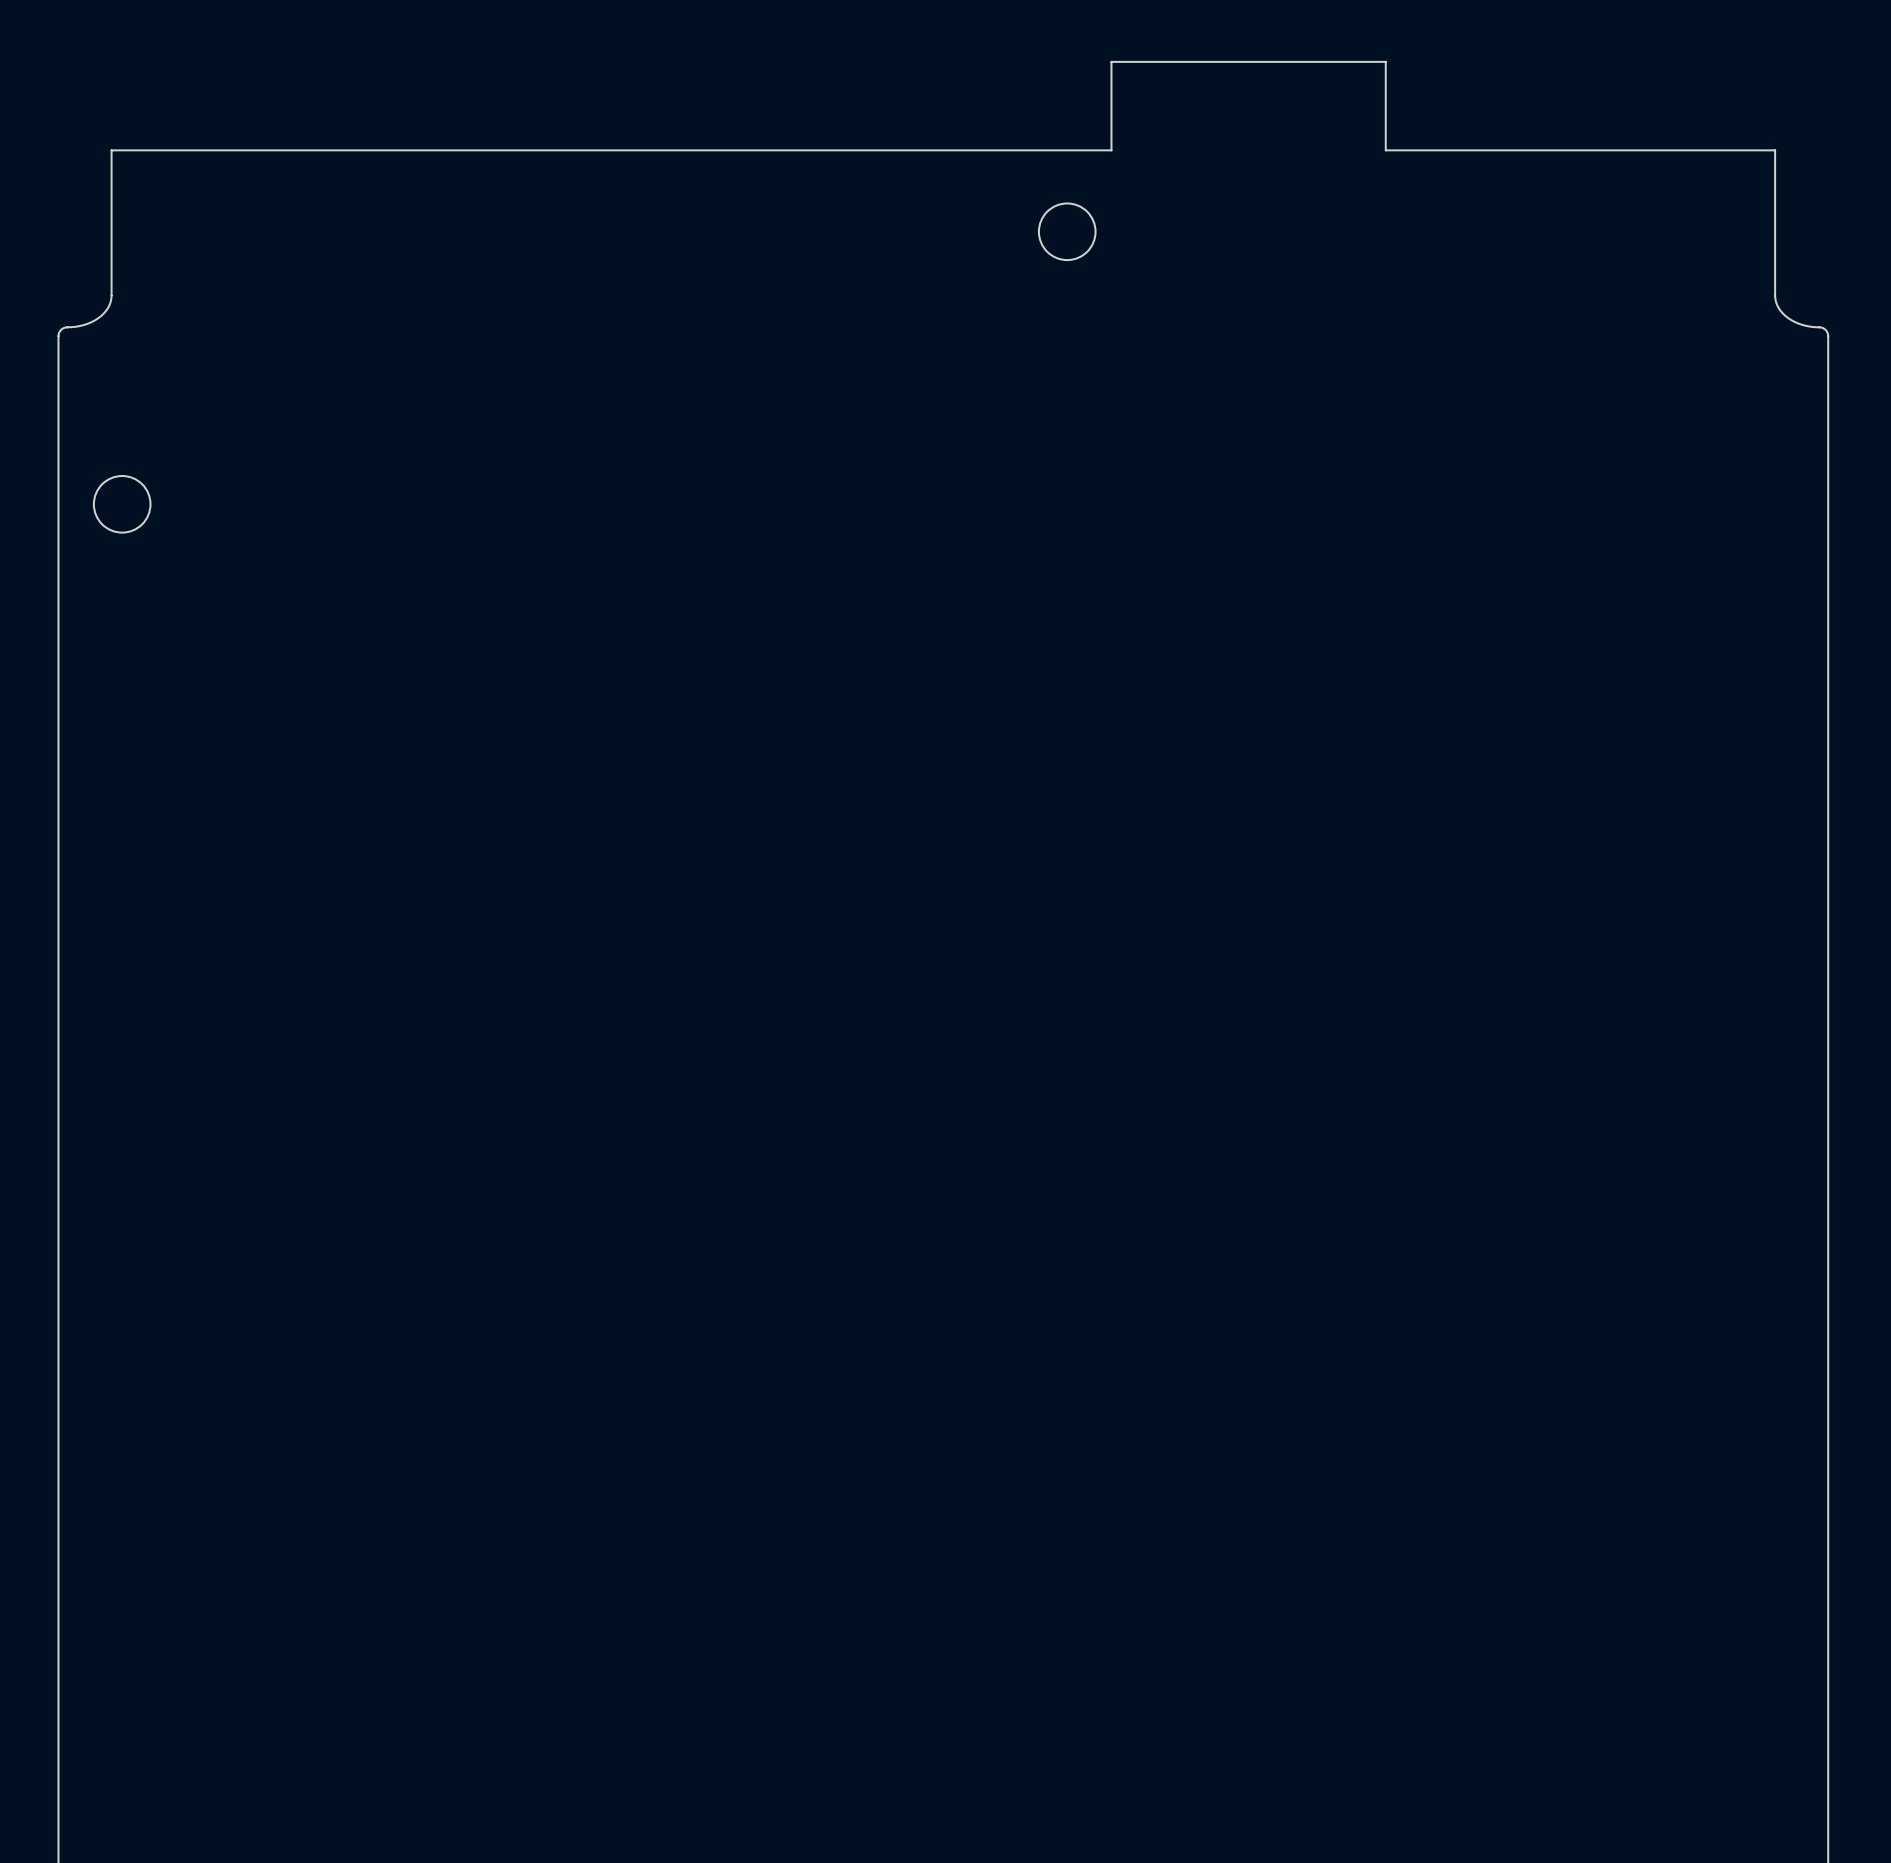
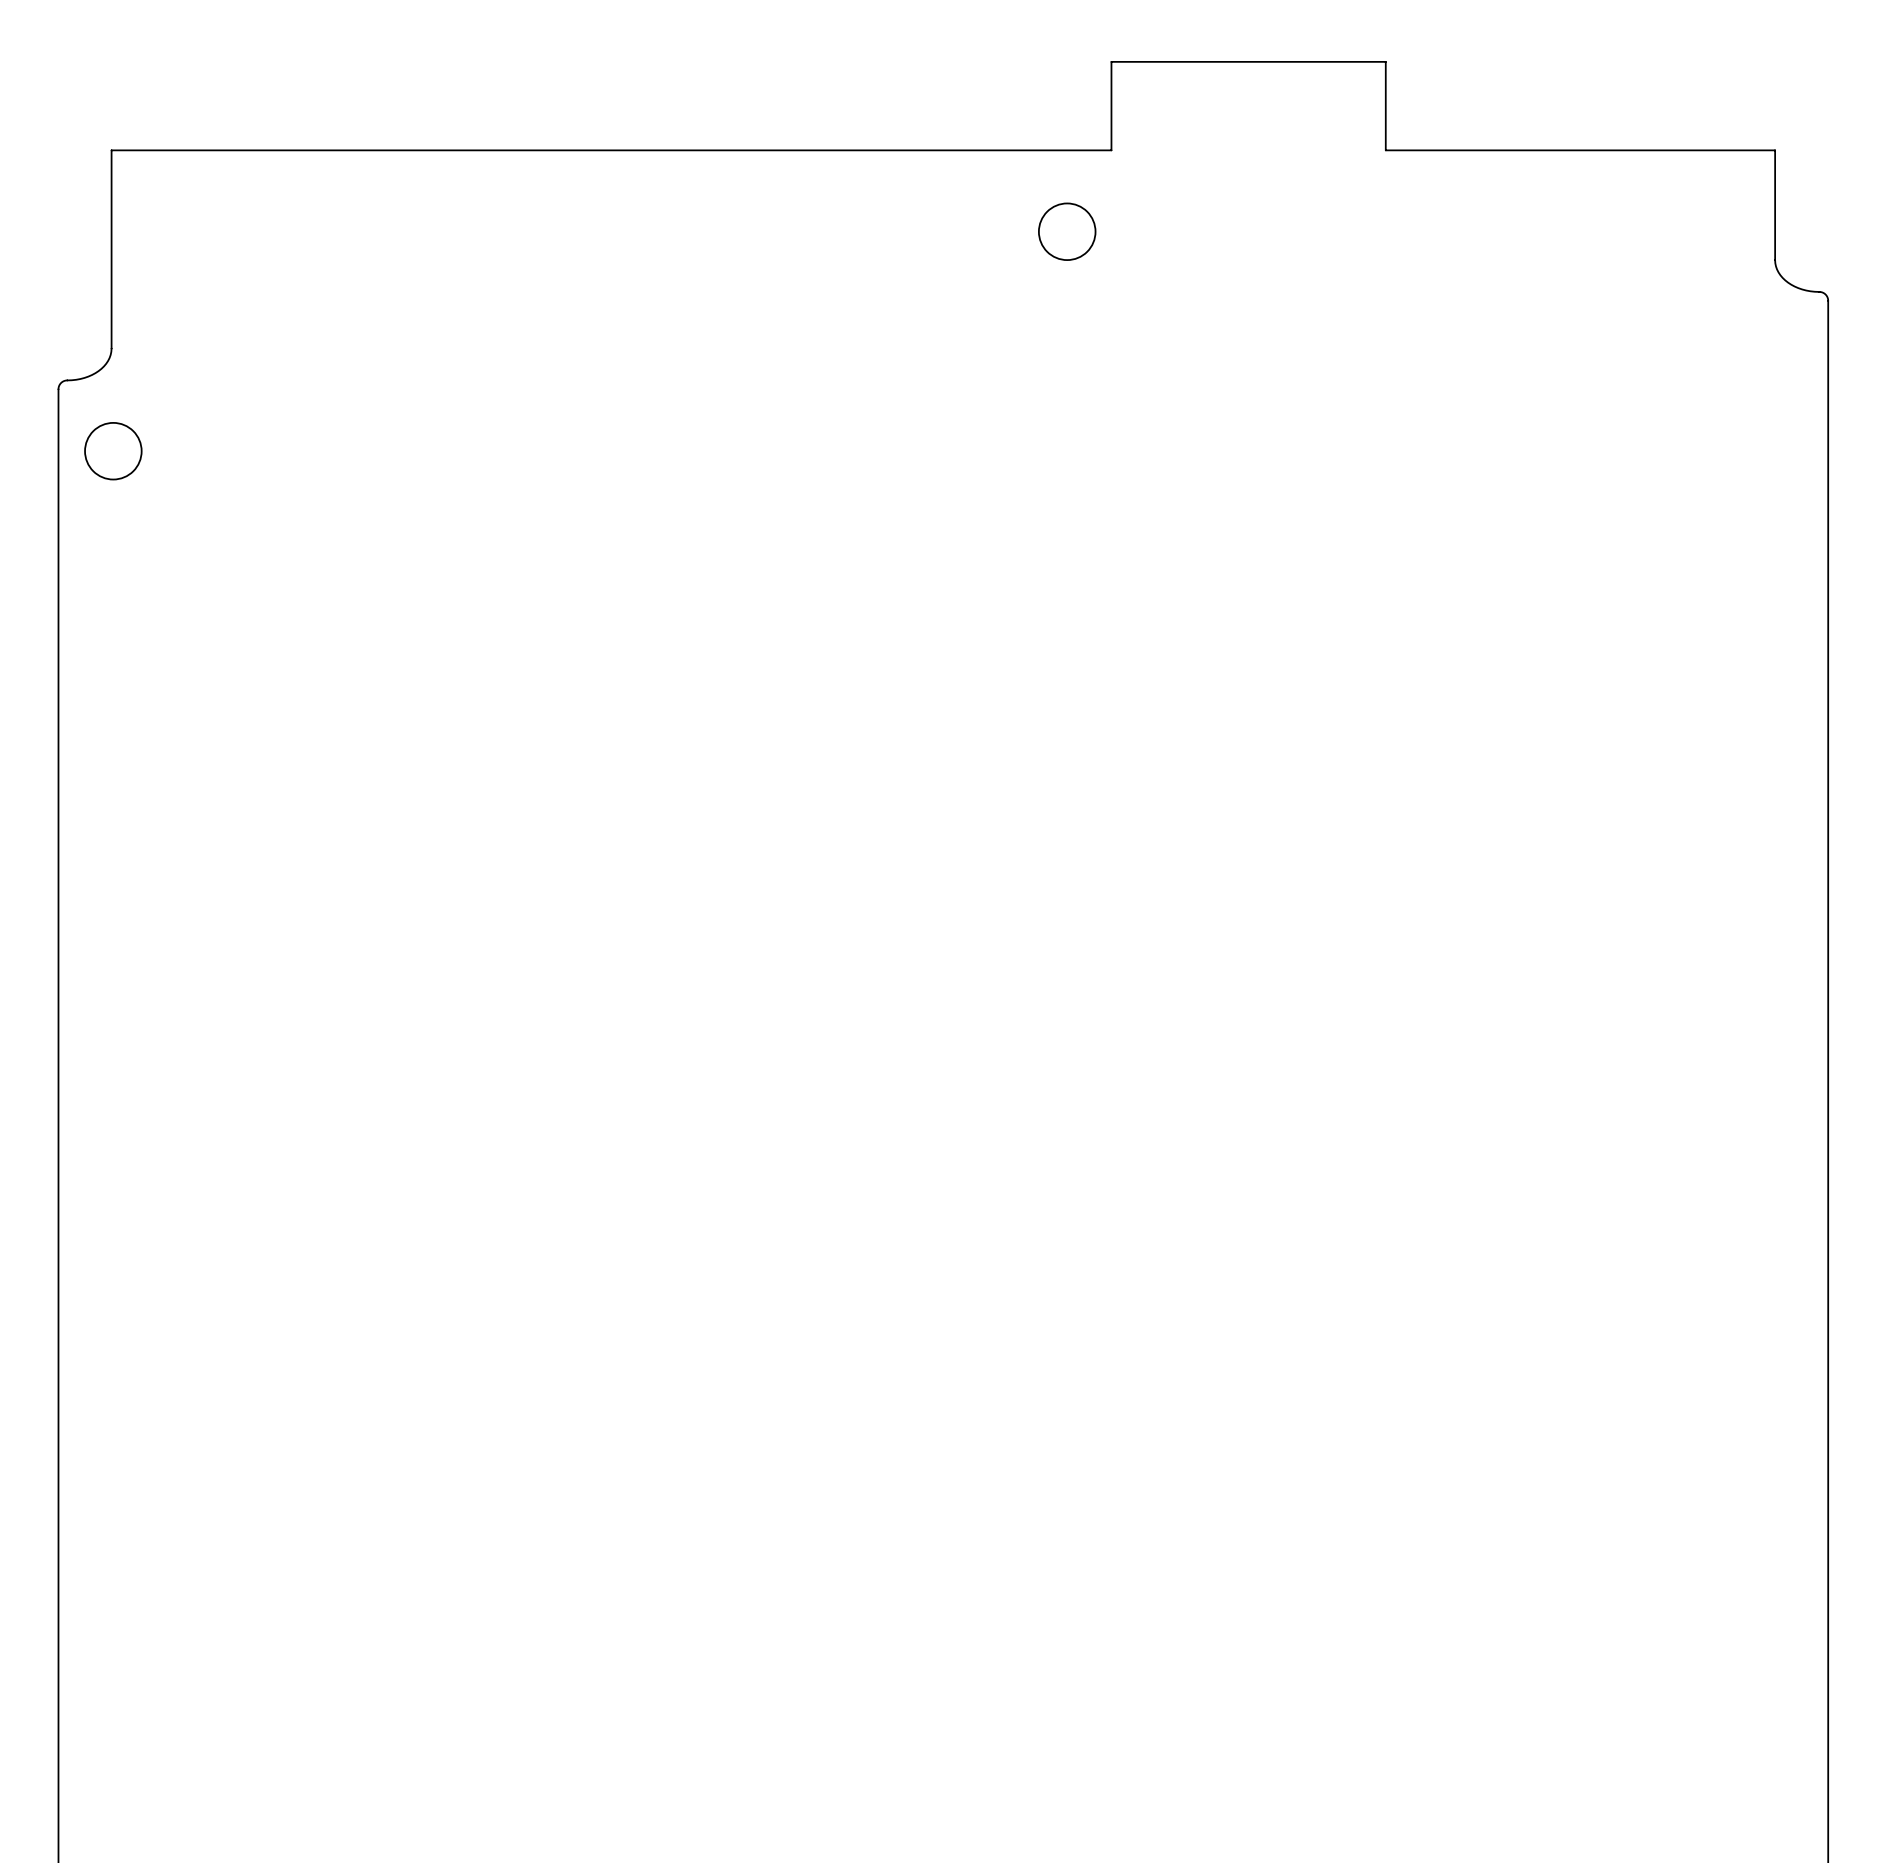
board edge: (1775, 260) (1775, 298) (1780, 310) (1788, 318) (1798, 323) (1823, 328) (1828, 336) -> (1775, 260) (1778, 272) (1788, 282) (1802, 289) (1822, 292) (1826, 296) (1828, 336)
board edge: (111, 295) (108, 307) (98, 318) (84, 324) (64, 327) (59, 331) (58, 389) -> (111, 295) (111, 348) (108, 360) (101, 368) (92, 374) (62, 381) (58, 389)
round board edge position: (122, 504) -> (113, 451)

